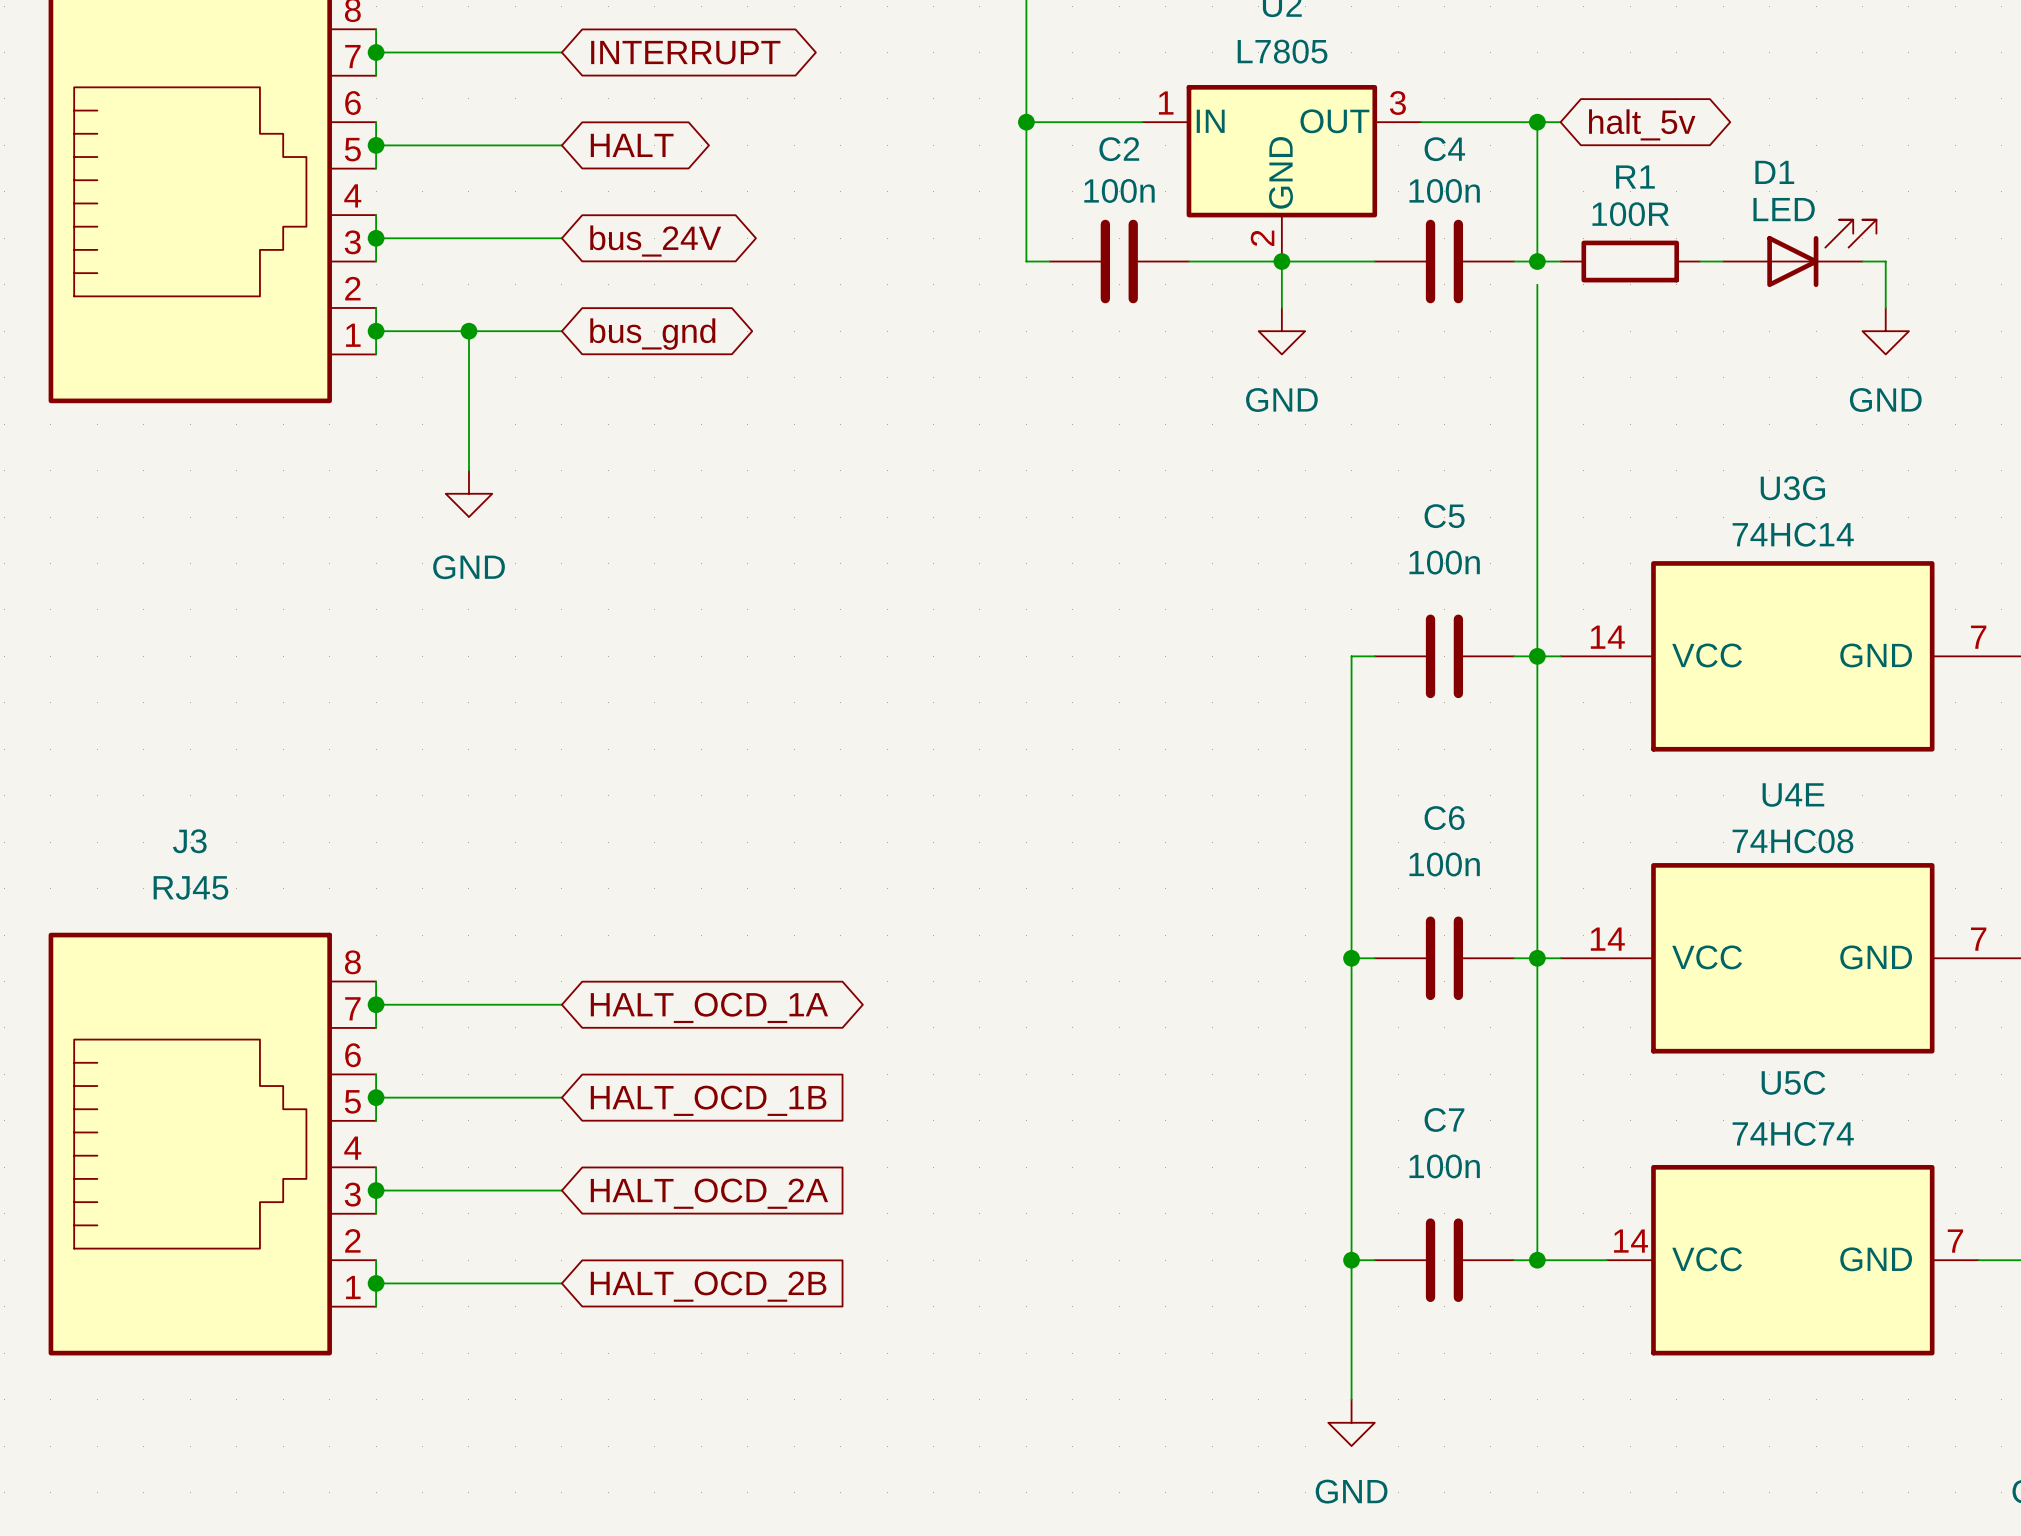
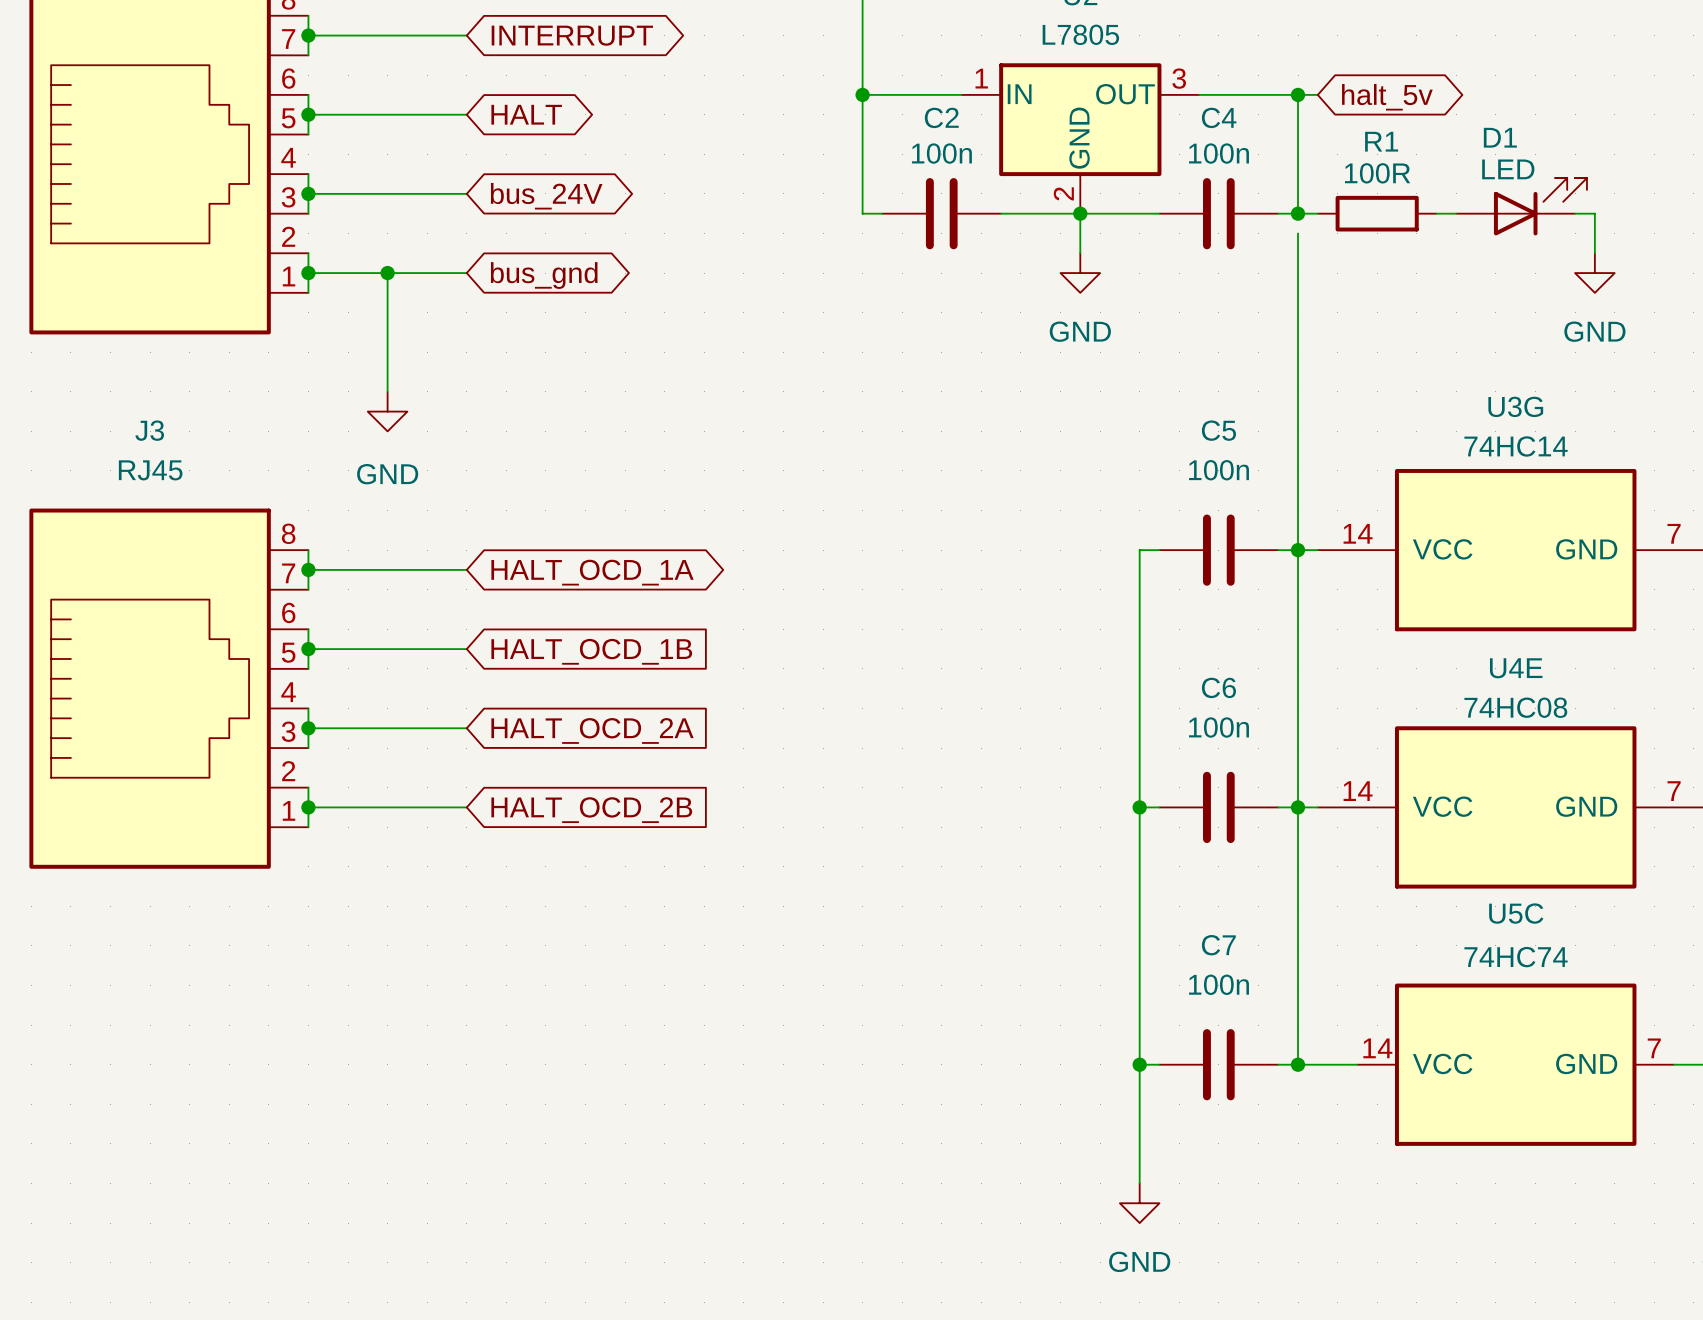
wire: none -> (308, 550) (308, 589)
junction: none -> (308, 569)
junction: none -> (308, 649)
junction: none -> (308, 728)
wire: (376, 981) (376, 1027) -> (308, 827) (308, 787)
wire: (376, 1004) (561, 1004) -> (308, 569) (466, 569)
junction position: (376, 1004) -> (308, 807)
global label position: HALT_OCD_1A (709, 1007) -> HALT_OCD_1A (592, 572)
wire: (376, 1074) (376, 1120) -> (308, 629) (308, 668)
wire: (376, 1097) (561, 1097) -> (308, 649) (466, 649)
junction: (376, 1097) -> none
global label position: HALT_OCD_1B (708, 1100) -> HALT_OCD_1B (591, 651)
J3 position: (212, 1144) -> (168, 688)
wire: (376, 1167) (376, 1213) -> (308, 708) (308, 748)
wire: (376, 1190) (561, 1190) -> (308, 728) (466, 728)
junction: (376, 1190) -> none
global label position: HALT_OCD_2A (709, 1193) -> HALT_OCD_2A (592, 730)
wire: (376, 1260) (376, 1306) -> none
wire: (376, 1283) (561, 1283) -> (308, 807) (466, 807)
junction: (376, 1283) -> none
global label position: HALT_OCD_2B (708, 1286) -> HALT_OCD_2B (591, 810)

